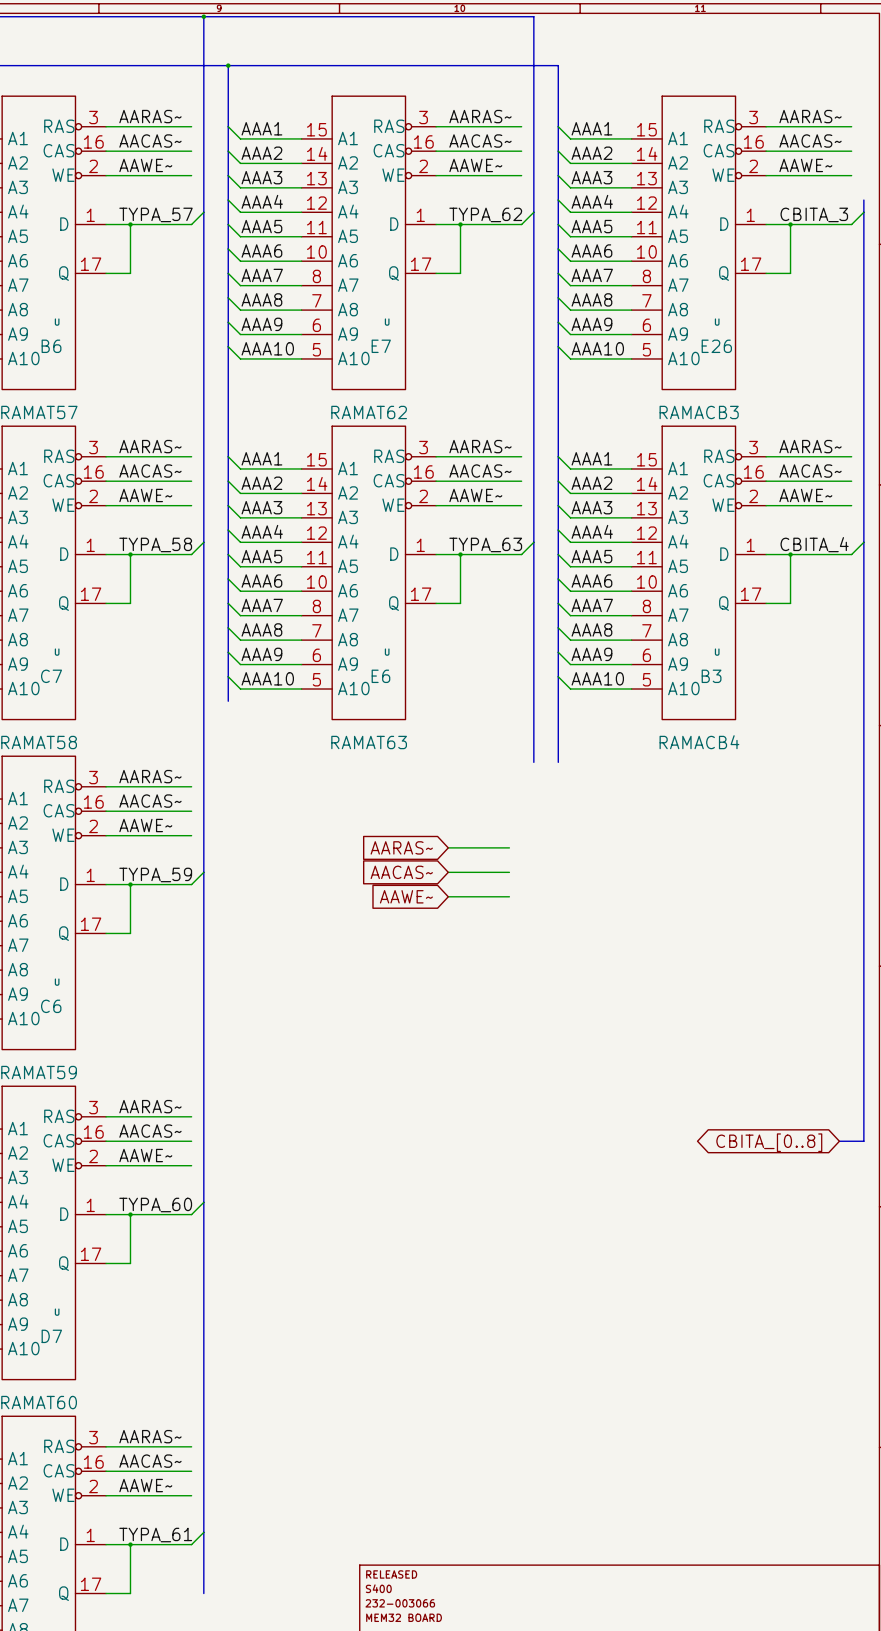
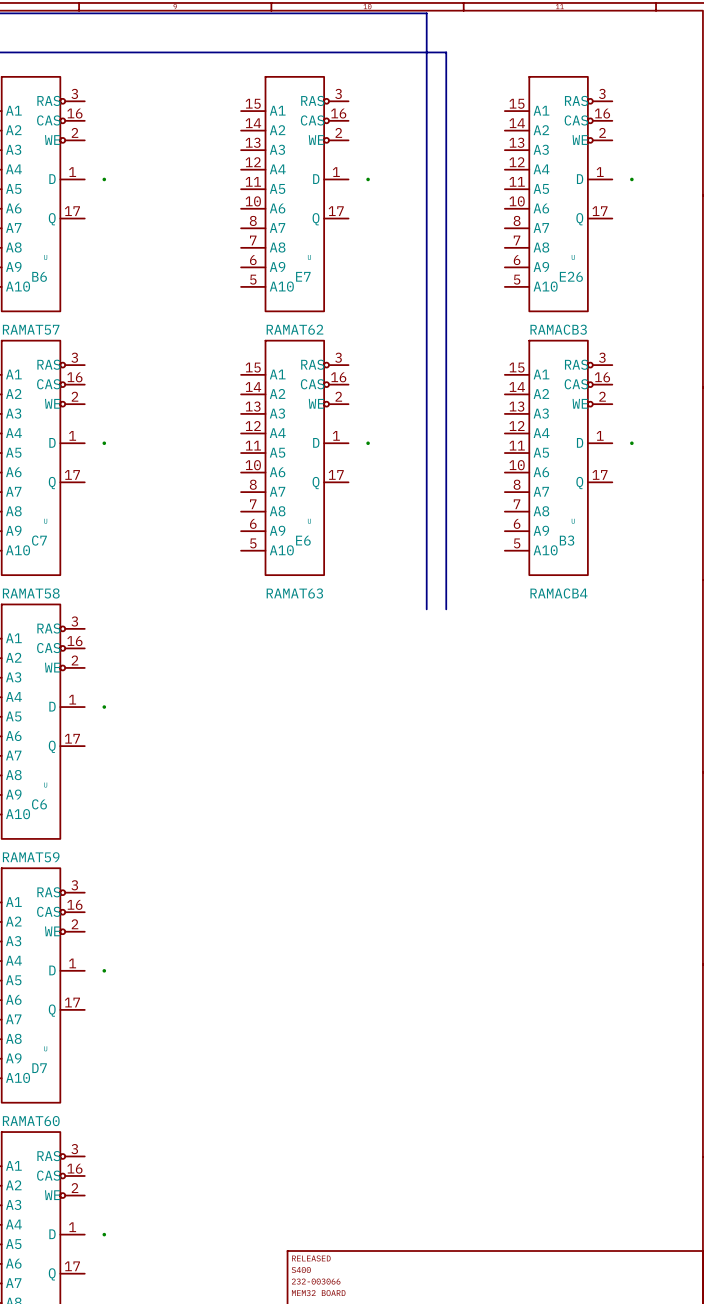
bus: (203, 16) (203, 1593) -> none
junction: (203, 16) -> none
bus: (228, 65) (228, 701) -> none
junction: (228, 65) -> none
label: AARAS~ (150, 116) -> none
label: AARAS~ (480, 116) -> none
label: AARAS~ (810, 116) -> none
wire: (106, 126) (191, 126) -> none
wire: (228, 126) (240, 138) (301, 138) -> none
wire: (436, 126) (521, 126) -> none
wire: (558, 126) (570, 138) (631, 138) -> none
wire: (766, 126) (851, 126) -> none
label: AAA1 (261, 128) -> none
label: AAA1 (591, 128) -> none
label: AACAS~ (150, 141) -> none
label: AACAS~ (480, 141) -> none
label: AACAS~ (810, 141) -> none
wire: (106, 151) (191, 151) -> none
wire: (228, 151) (240, 163) (301, 163) -> none
wire: (436, 151) (521, 151) -> none
wire: (558, 151) (570, 163) (631, 163) -> none
wire: (766, 151) (851, 151) -> none
label: AAA2 (261, 153) -> none
label: AAA2 (591, 153) -> none
label: AAWE~ (145, 165) -> none
label: AAWE~ (475, 165) -> none
label: AAWE~ (805, 165) -> none
wire: (106, 175) (191, 175) -> none
wire: (228, 175) (240, 187) (301, 187) -> none
wire: (436, 175) (521, 175) -> none
wire: (558, 175) (570, 187) (631, 187) -> none
wire: (766, 175) (851, 175) -> none
label: AAA3 (261, 177) -> none
label: AAA3 (591, 177) -> none
wire: (228, 200) (240, 212) (301, 212) -> none
wire: (558, 200) (570, 212) (631, 212) -> none
bus: (863, 200) (863, 1141) (839, 1141) -> none
label: AAA4 (262, 201) -> none
label: AAA4 (592, 201) -> none
wire: (203, 212) (191, 224) (106, 224) -> none
wire: (533, 212) (521, 224) (436, 224) -> none
wire: (863, 212) (851, 224) (766, 224) -> none
label: TYPA_57 (155, 214) -> none
label: TYPA_62 (485, 214) -> none
label: CBITA_3 (814, 214) -> none
wire: (130, 224) (130, 273) (106, 273) -> none
wire: (228, 224) (240, 236) (301, 236) -> none
wire: (460, 224) (460, 273) (436, 273) -> none
wire: (558, 224) (570, 236) (631, 236) -> none
wire: (790, 224) (790, 273) (766, 273) -> none
label: AAA5 (261, 226) -> none
label: AAA5 (591, 226) -> none
wire: (228, 248) (240, 261) (301, 261) -> none
wire: (558, 248) (570, 261) (631, 261) -> none
label: AAA6 (261, 251) -> none
label: AAA6 (591, 251) -> none
wire: (228, 273) (240, 285) (301, 285) -> none
wire: (558, 273) (570, 285) (631, 285) -> none
label: AAA7 (262, 275) -> none
label: AAA7 (592, 275) -> none
wire: (228, 297) (240, 310) (301, 310) -> none
wire: (558, 297) (570, 310) (631, 310) -> none
label: AAA8 (261, 299) -> none
label: AAA8 (591, 299) -> none
wire: (228, 322) (240, 334) (301, 334) -> none
wire: (558, 322) (570, 334) (631, 334) -> none
label: AAA9 (261, 324) -> none
label: AAA9 (591, 324) -> none
wire: (228, 346) (240, 358) (301, 358) -> none
wire: (558, 346) (570, 358) (631, 358) -> none
label: AAA10 (267, 348) -> none
label: AAA10 (597, 348) -> none
label: AARAS~ (150, 446) -> none
label: AARAS~ (480, 446) -> none
label: AARAS~ (810, 446) -> none
wire: (106, 456) (191, 456) -> none
wire: (228, 456) (240, 468) (301, 468) -> none
wire: (436, 456) (521, 456) -> none
wire: (558, 456) (570, 468) (631, 468) -> none
wire: (766, 456) (851, 456) -> none
label: AAA1 (261, 458) -> none
label: AAA1 (591, 458) -> none
label: AACAS~ (150, 471) -> none
label: AACAS~ (480, 471) -> none
label: AACAS~ (810, 471) -> none
wire: (106, 481) (191, 481) -> none
wire: (228, 481) (240, 493) (301, 493) -> none
wire: (436, 481) (521, 481) -> none
wire: (558, 481) (570, 493) (631, 493) -> none
wire: (766, 481) (851, 481) -> none
label: AAA2 (261, 483) -> none
label: AAA2 (591, 483) -> none
label: AAWE~ (145, 495) -> none
label: AAWE~ (475, 495) -> none
label: AAWE~ (805, 495) -> none
wire: (106, 505) (191, 505) -> none
wire: (228, 505) (240, 517) (301, 517) -> none
wire: (436, 505) (521, 505) -> none
wire: (558, 505) (570, 517) (631, 517) -> none
wire: (766, 505) (851, 505) -> none
label: AAA3 (261, 507) -> none
label: AAA3 (591, 507) -> none
wire: (228, 530) (240, 542) (301, 542) -> none
wire: (558, 530) (570, 542) (631, 542) -> none
label: AAA4 (262, 531) -> none
label: AAA4 (592, 531) -> none
wire: (203, 542) (191, 554) (106, 554) -> none
wire: (533, 542) (521, 554) (436, 554) -> none
wire: (863, 542) (851, 554) (766, 554) -> none
label: TYPA_58 (155, 544) -> none
label: TYPA_63 (485, 544) -> none
label: CBITA_4 (814, 544) -> none
wire: (130, 554) (130, 603) (106, 603) -> none
wire: (228, 554) (240, 566) (301, 566) -> none
wire: (460, 554) (460, 603) (436, 603) -> none
wire: (558, 554) (570, 566) (631, 566) -> none
wire: (790, 554) (790, 603) (766, 603) -> none
label: AAA5 (261, 556) -> none
label: AAA5 (591, 556) -> none
wire: (228, 578) (240, 591) (301, 591) -> none
wire: (558, 578) (570, 591) (631, 591) -> none
label: AAA6 (261, 581) -> none
label: AAA6 (591, 581) -> none
wire: (228, 603) (240, 615) (301, 615) -> none
wire: (558, 603) (570, 615) (631, 615) -> none
label: AAA7 (262, 605) -> none
label: AAA7 (592, 605) -> none
wire: (228, 627) (240, 640) (301, 640) -> none
wire: (558, 627) (570, 640) (631, 640) -> none
label: AAA8 (261, 629) -> none
label: AAA8 (591, 629) -> none
wire: (228, 652) (240, 664) (301, 664) -> none
wire: (558, 652) (570, 664) (631, 664) -> none
label: AAA9 (261, 654) -> none
label: AAA9 (591, 654) -> none
wire: (228, 676) (240, 689) (301, 689) -> none
wire: (558, 676) (570, 689) (631, 689) -> none
label: AAA10 (267, 678) -> none
label: AAA10 (597, 678) -> none
label: AARAS~ (150, 776) -> none
wire: (106, 786) (191, 786) -> none
label: AACAS~ (150, 801) -> none
wire: (106, 811) (191, 811) -> none
label: AAWE~ (145, 825) -> none
wire: (106, 835) (191, 835) -> none
global label: AARAS~ (401, 847) -> none
wire: (448, 847) (509, 847) -> none
wire: (203, 872) (191, 884) (106, 884) -> none
global label: AACAS~ (401, 872) -> none
wire: (448, 872) (509, 872) -> none
label: TYPA_59 (155, 874) -> none
wire: (130, 884) (130, 933) (106, 933) -> none
global label: AAWE~ (406, 896) -> none
wire: (448, 896) (509, 896) -> none
label: AARAS~ (150, 1106) -> none
wire: (106, 1116) (191, 1116) -> none
label: AACAS~ (150, 1131) -> none
wire: (106, 1141) (191, 1141) -> none
global label: CBITA_[0..8] (769, 1142) -> none
label: AAWE~ (145, 1155) -> none
wire: (106, 1165) (191, 1165) -> none
wire: (203, 1202) (191, 1214) (106, 1214) -> none
label: TYPA_60 (155, 1205) -> none
wire: (130, 1214) (130, 1263) (106, 1263) -> none
label: AARAS~ (150, 1436) -> none
wire: (106, 1446) (191, 1446) -> none
label: AACAS~ (150, 1461) -> none
wire: (106, 1471) (191, 1471) -> none
label: AAWE~ (145, 1485) -> none
wire: (106, 1495) (191, 1495) -> none
wire: (203, 1532) (191, 1544) (106, 1544) -> none
label: TYPA_61 (155, 1535) -> none
wire: (130, 1544) (130, 1593) (106, 1593) -> none

